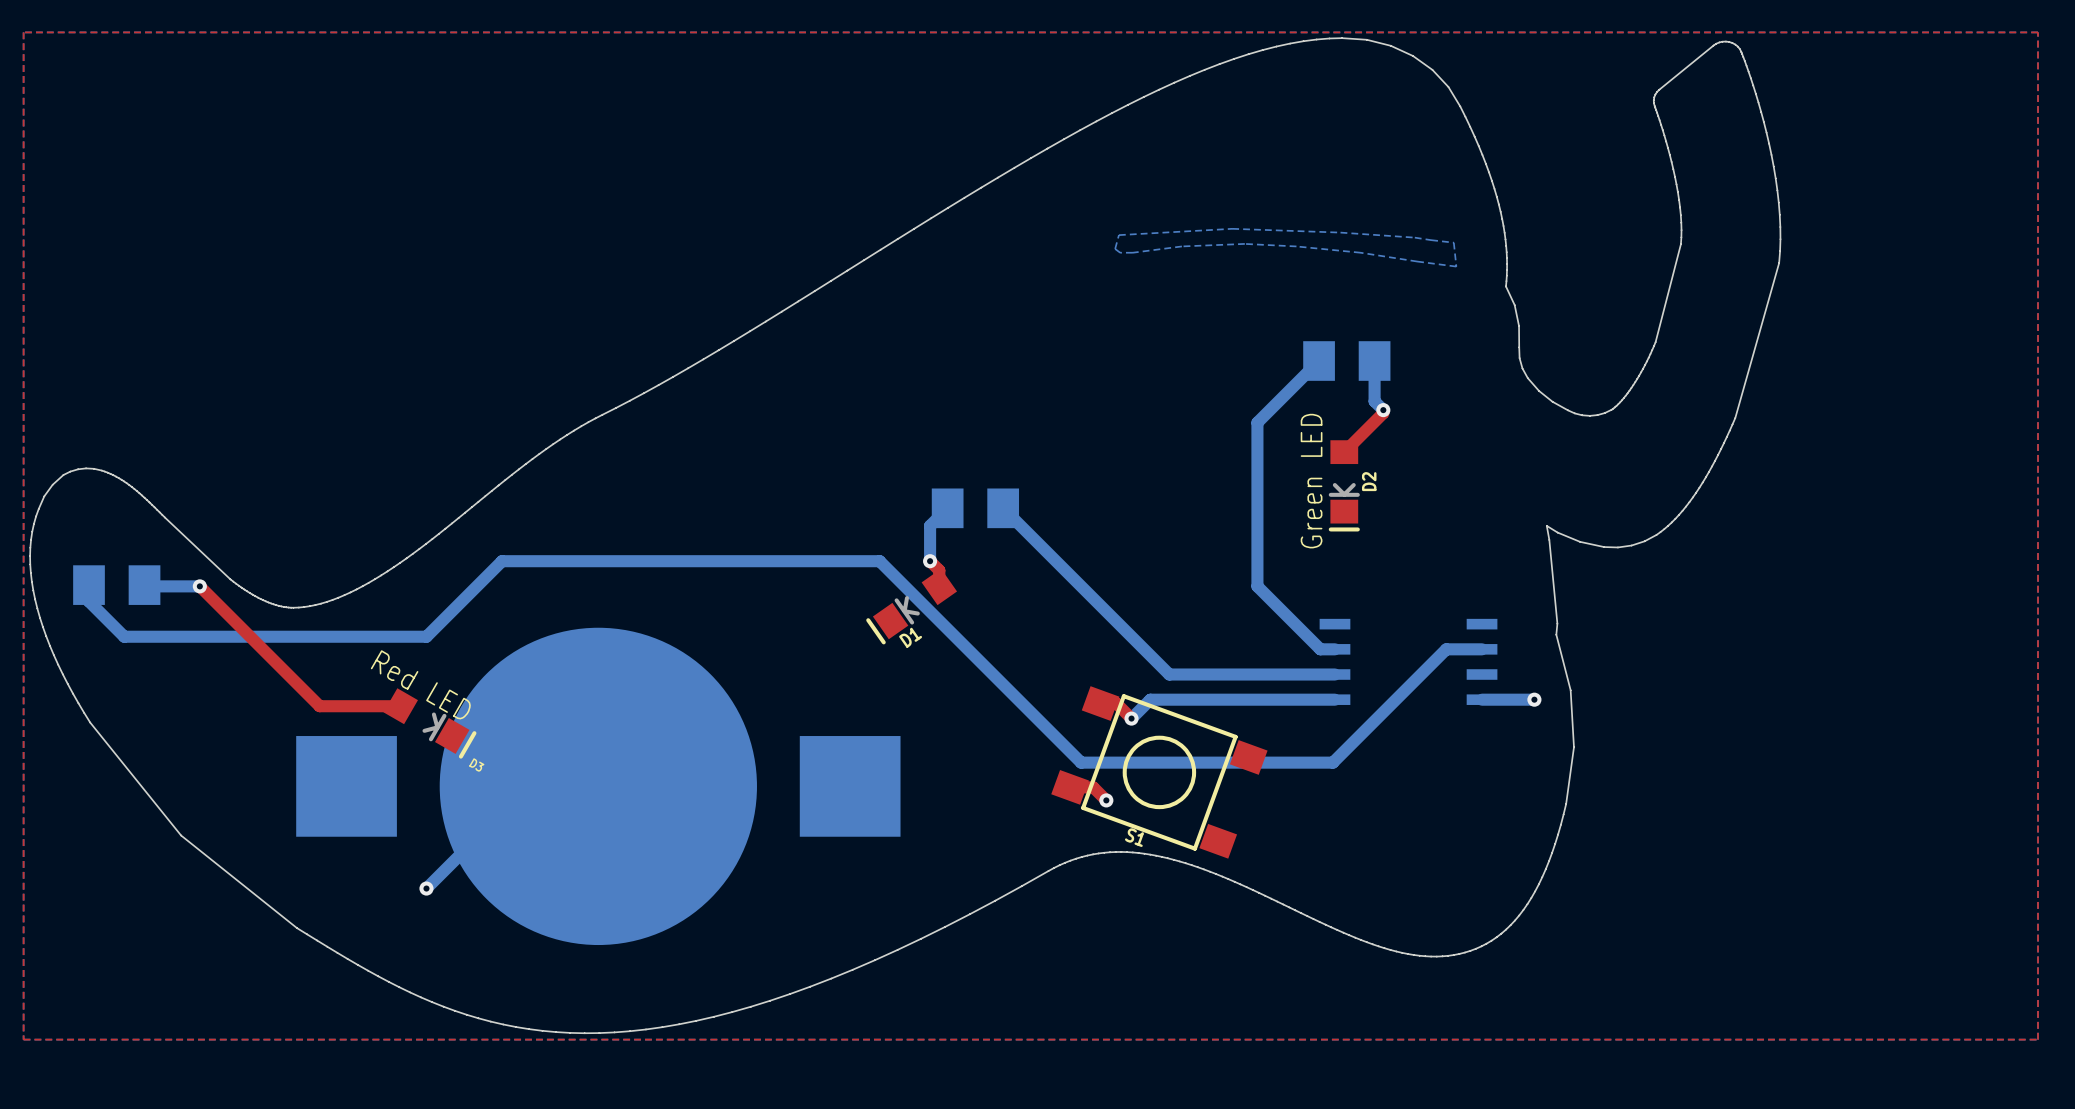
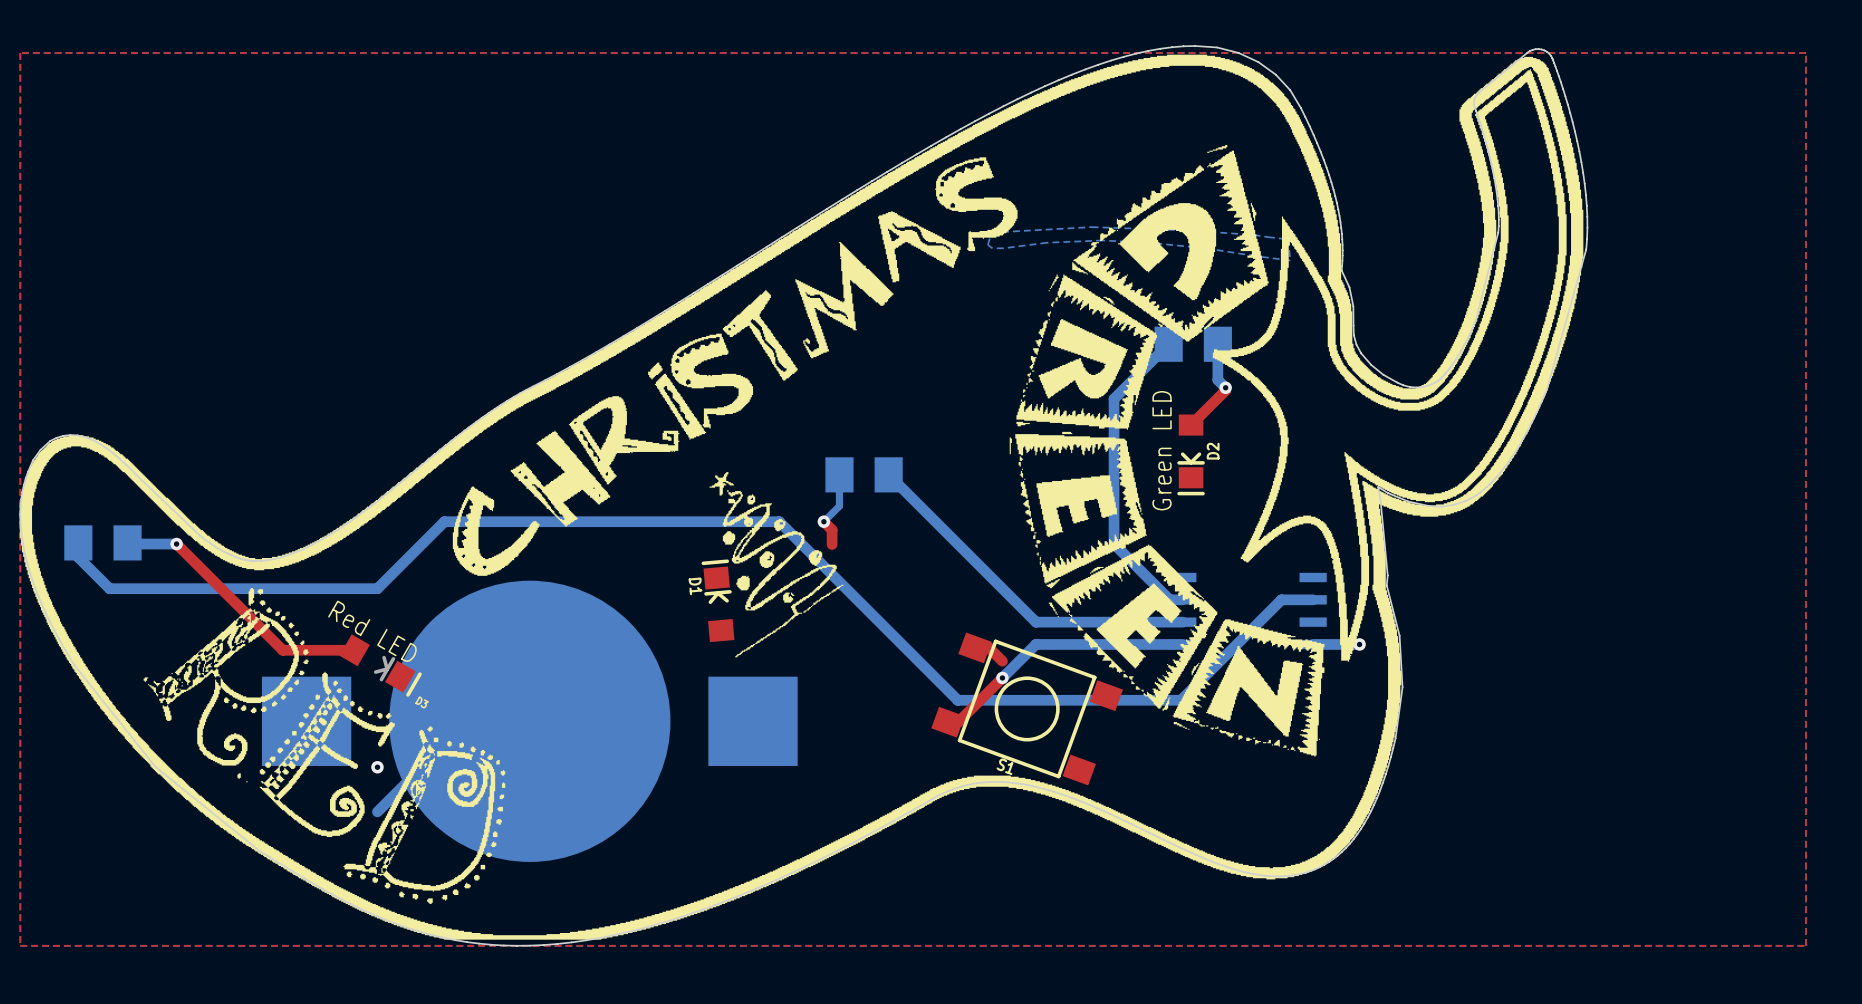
drawing: none -> [19, 54, 1584, 940]
board edge: (1342, 38) (1290, 43) (1234, 58) (1159, 89) (1080, 130) (964, 197) (703, 359) (567, 434) (518, 469) (406, 558) (368, 582) (332, 599) (309, 606) (293, 607) (278, 605) (263, 600) (230, 579) (144, 497) (121, 479) (94, 468) (78, 469) (63, 475) (52, 484) (44, 496) (38, 509) (32, 531) (30, 556) (31, 581) (37, 608) (46, 636) (62, 674) (90, 722) (181, 835) (296, 928) (367, 970) (421, 997) (466, 1014) (516, 1027) (570, 1032) (630, 1031) (696, 1020) (750, 1006) (831, 978) (897, 949) (969, 914) (1065, 862) (1087, 855) (1110, 852) (1150, 854) (1197, 867) (1240, 884) (1349, 935) (1396, 951) (1419, 955) (1442, 956) (1465, 952) (1481, 946) (1496, 937) (1510, 925) (1531, 897) (1552, 852) (1566, 803) (1573, 747) (1570, 690) (1556, 634) (1557, 623) (1546, 525) (1580, 541) (1604, 547) (1631, 545) (1644, 541) (1664, 529) (1682, 510) (1699, 487) (1718, 454) (1735, 418) (1779, 263) (1780, 227) (1775, 178) (1761, 112) (1741, 51) (1732, 43) (1722, 41) (1716, 43) (1659, 89) (1654, 97) (1653, 103) (1674, 176) (1681, 230) (1680, 244) (1655, 342) (1637, 378) (1616, 405) (1597, 415) (1574, 413) (1552, 401) (1539, 390) (1522, 368) (1519, 358) (1519, 326) (1514, 305) (1505, 286) (1506, 245) (1498, 204) (1478, 145) (1460, 106) (1448, 87) (1432, 69) (1413, 55) (1390, 45) (1366, 39) (1342, 38) -> (1194, 45) (1148, 50) (1098, 64) (1031, 92) (960, 129) (856, 190) (623, 336) (501, 404) (457, 435) (357, 516) (323, 538) (291, 553) (270, 559) (256, 561) (243, 559) (229, 554) (199, 535) (122, 461) (102, 445) (77, 435) (63, 435) (50, 441) (33, 460) (28, 471) (22, 492) (20, 521) (29, 570) (38, 595) (54, 629) (74, 664) (155, 766) (259, 850) (322, 889) (370, 913) (411, 929) (455, 940) (503, 945) (557, 943) (616, 934) (665, 921) (737, 896) (797, 870) (861, 838) (947, 791) (967, 785) (987, 782) (1023, 784) (1065, 795) (1104, 811) (1201, 857) (1243, 871) (1264, 875) (1284, 876) (1305, 872) (1319, 867) (1345, 848) (1364, 823) (1383, 782) (1395, 738) (1402, 687) (1399, 635) (1386, 585) (1387, 575) (1378, 487) (1408, 501) (1429, 506) (1454, 504) (1465, 500) (1483, 489) (1499, 473) (1514, 452) (1546, 389) (1586, 249) (1587, 216) (1583, 172) (1570, 112) (1552, 58) (1544, 50) (1532, 49) (1479, 92) (1474, 99) (1474, 104) (1492, 171) (1498, 219) (1498, 232) (1475, 320) (1459, 354) (1440, 378) (1423, 386) (1403, 385) (1383, 374) (1371, 364) (1356, 344) (1353, 335) (1353, 306) (1349, 287) (1341, 270) (1341, 233) (1335, 196) (1317, 143) (1290, 90) (1275, 74) (1258, 62) (1238, 52) (1217, 47) (1194, 45)
D2 footprint: [1328, 440, 1360, 532] -> [1177, 414, 1205, 496]
drawing: none -> [709, 472, 844, 658]
bottom track: (947, 508) (930, 525) (930, 561) -> (839, 474) (839, 506) (823, 521)
D1 footprint: [866, 568, 958, 645] -> [701, 559, 735, 643]
D1 name position: D1 (910, 637) -> D1 (695, 586)
bottom track: (1169, 699) (1150, 699) (1131, 718) -> (1035, 644) (1002, 677)
via position: (1131, 718) -> (1002, 677)
top track: (1081, 787) (1093, 787) (1106, 800) -> (958, 722) (1002, 677)
via: (1106, 800) -> none
via position: (426, 888) -> (377, 767)

